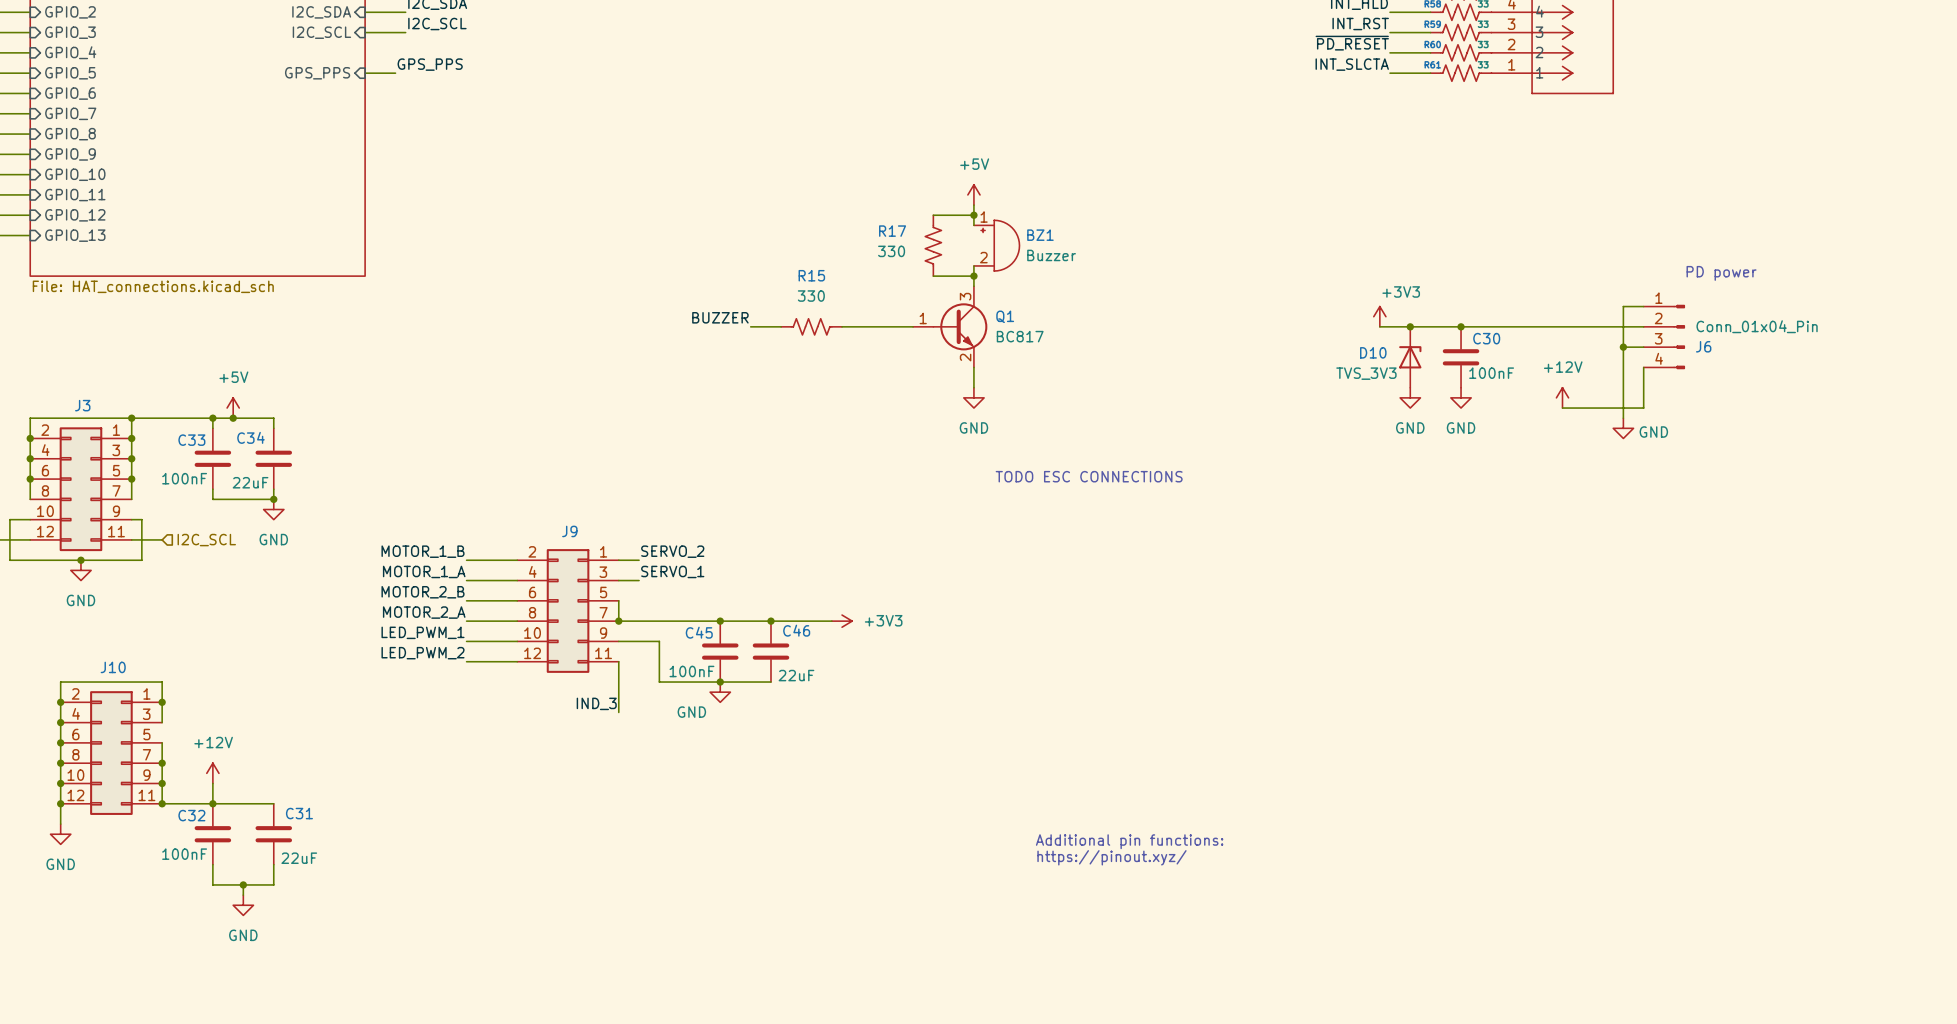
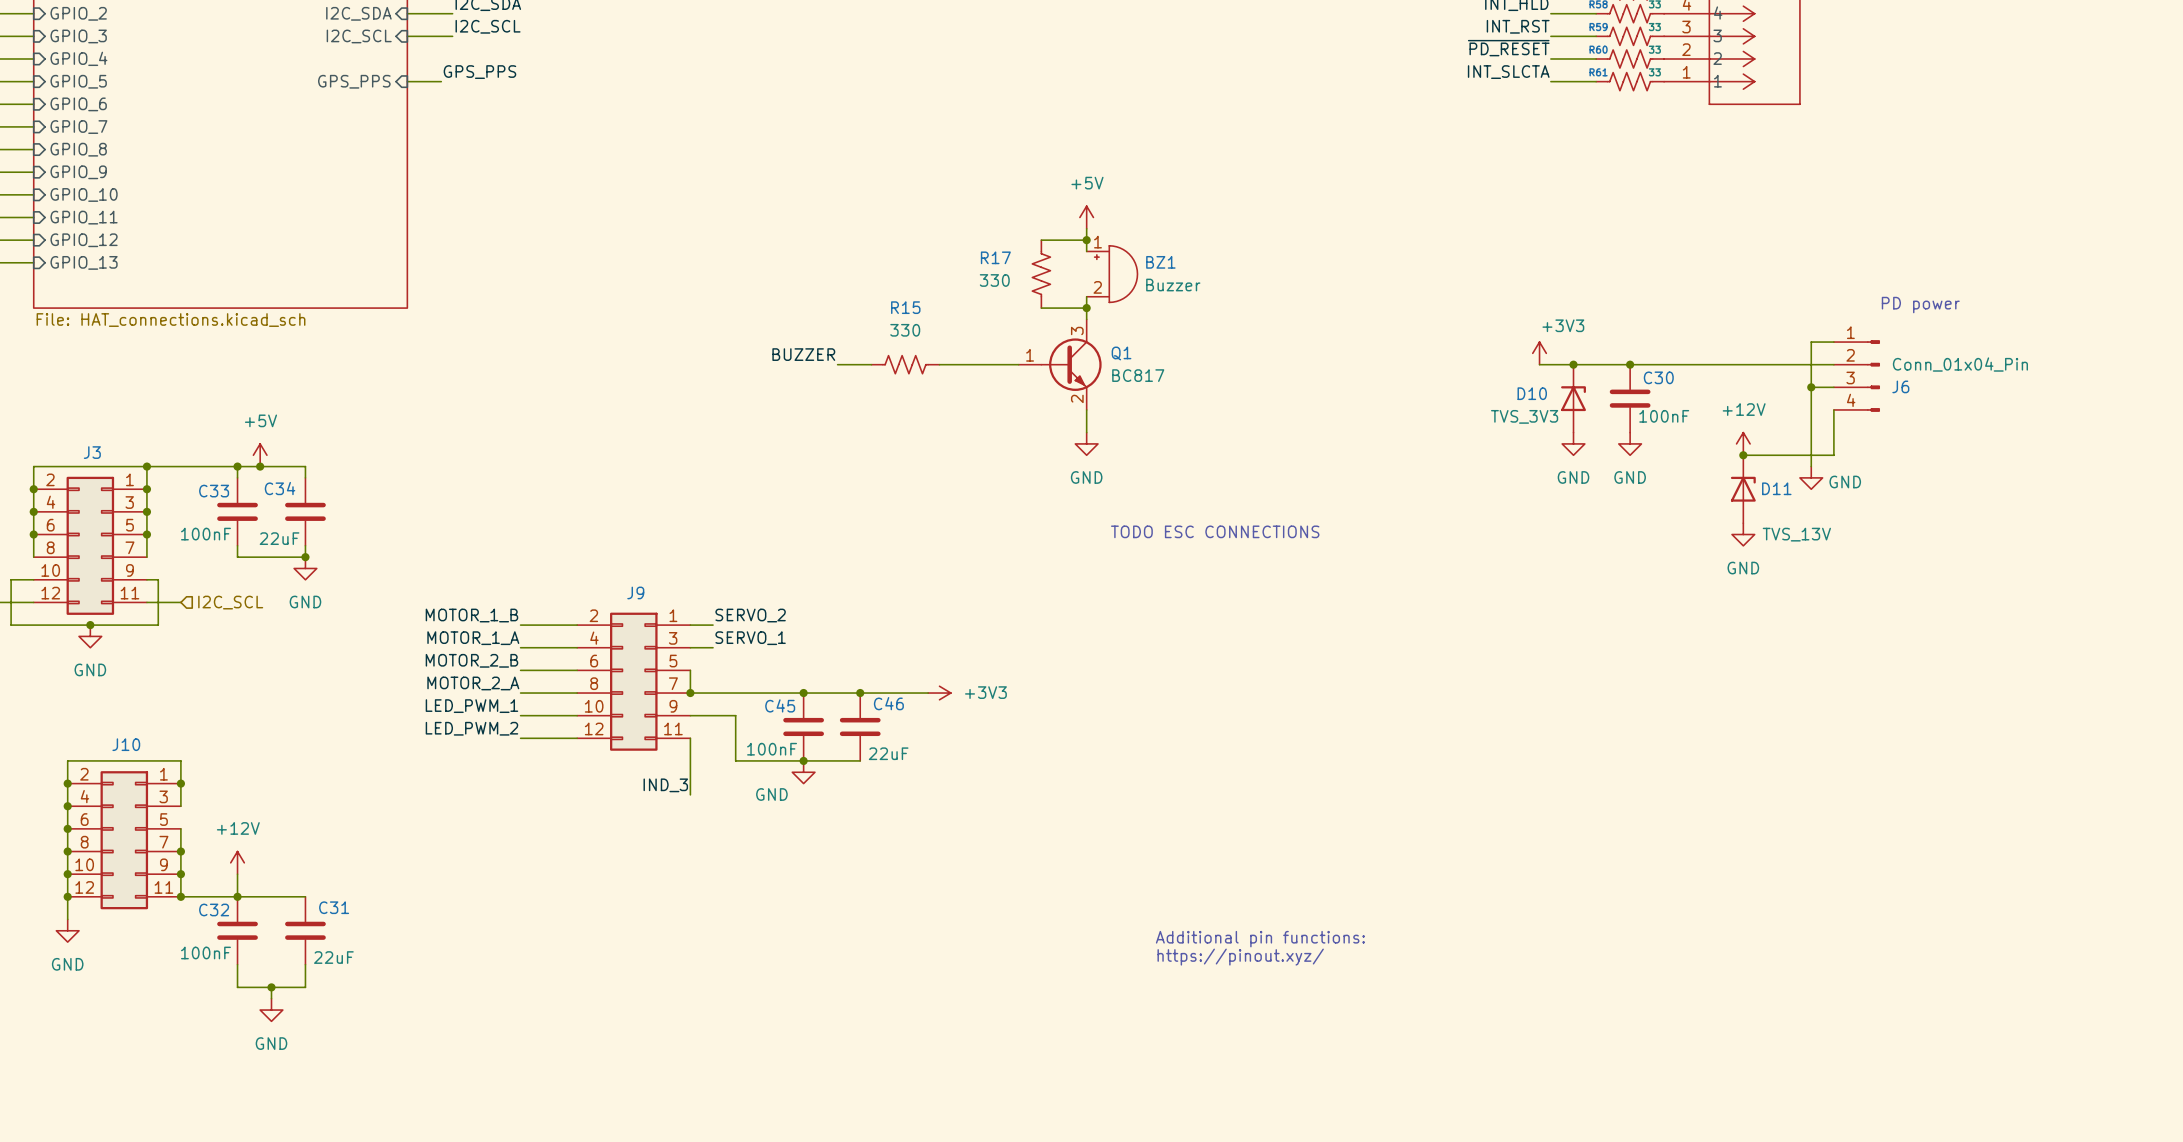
junction: none -> (1743, 455)
D11: none -> TVS_13V (1743, 489)
power symbol: none -> GND (1743, 534)

